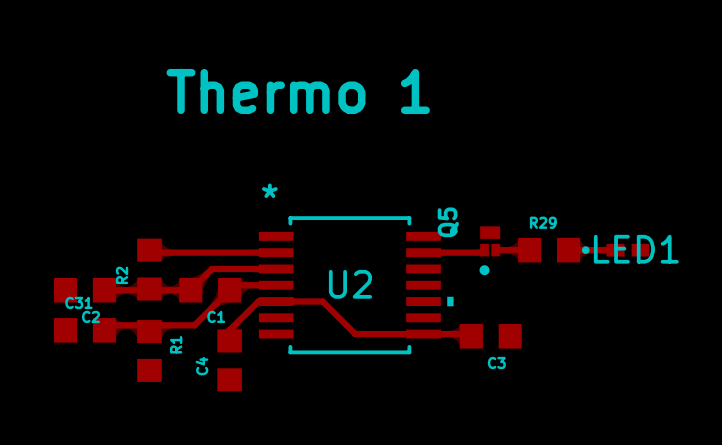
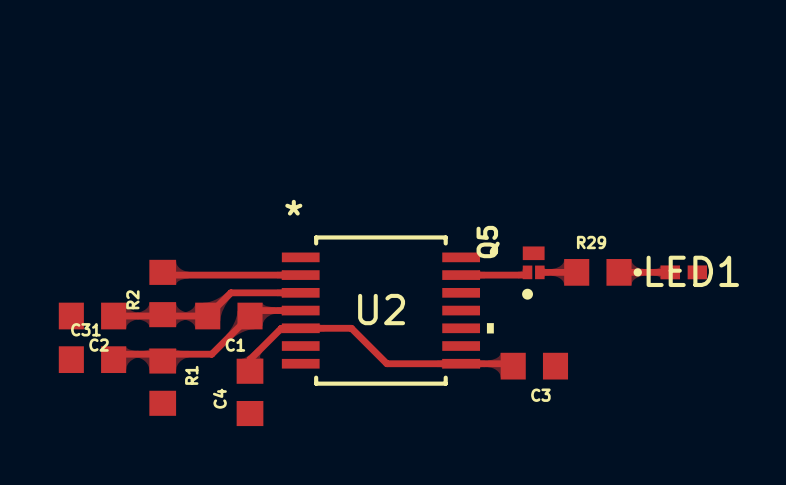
text: Thermo 1 (298, 91) -> none

